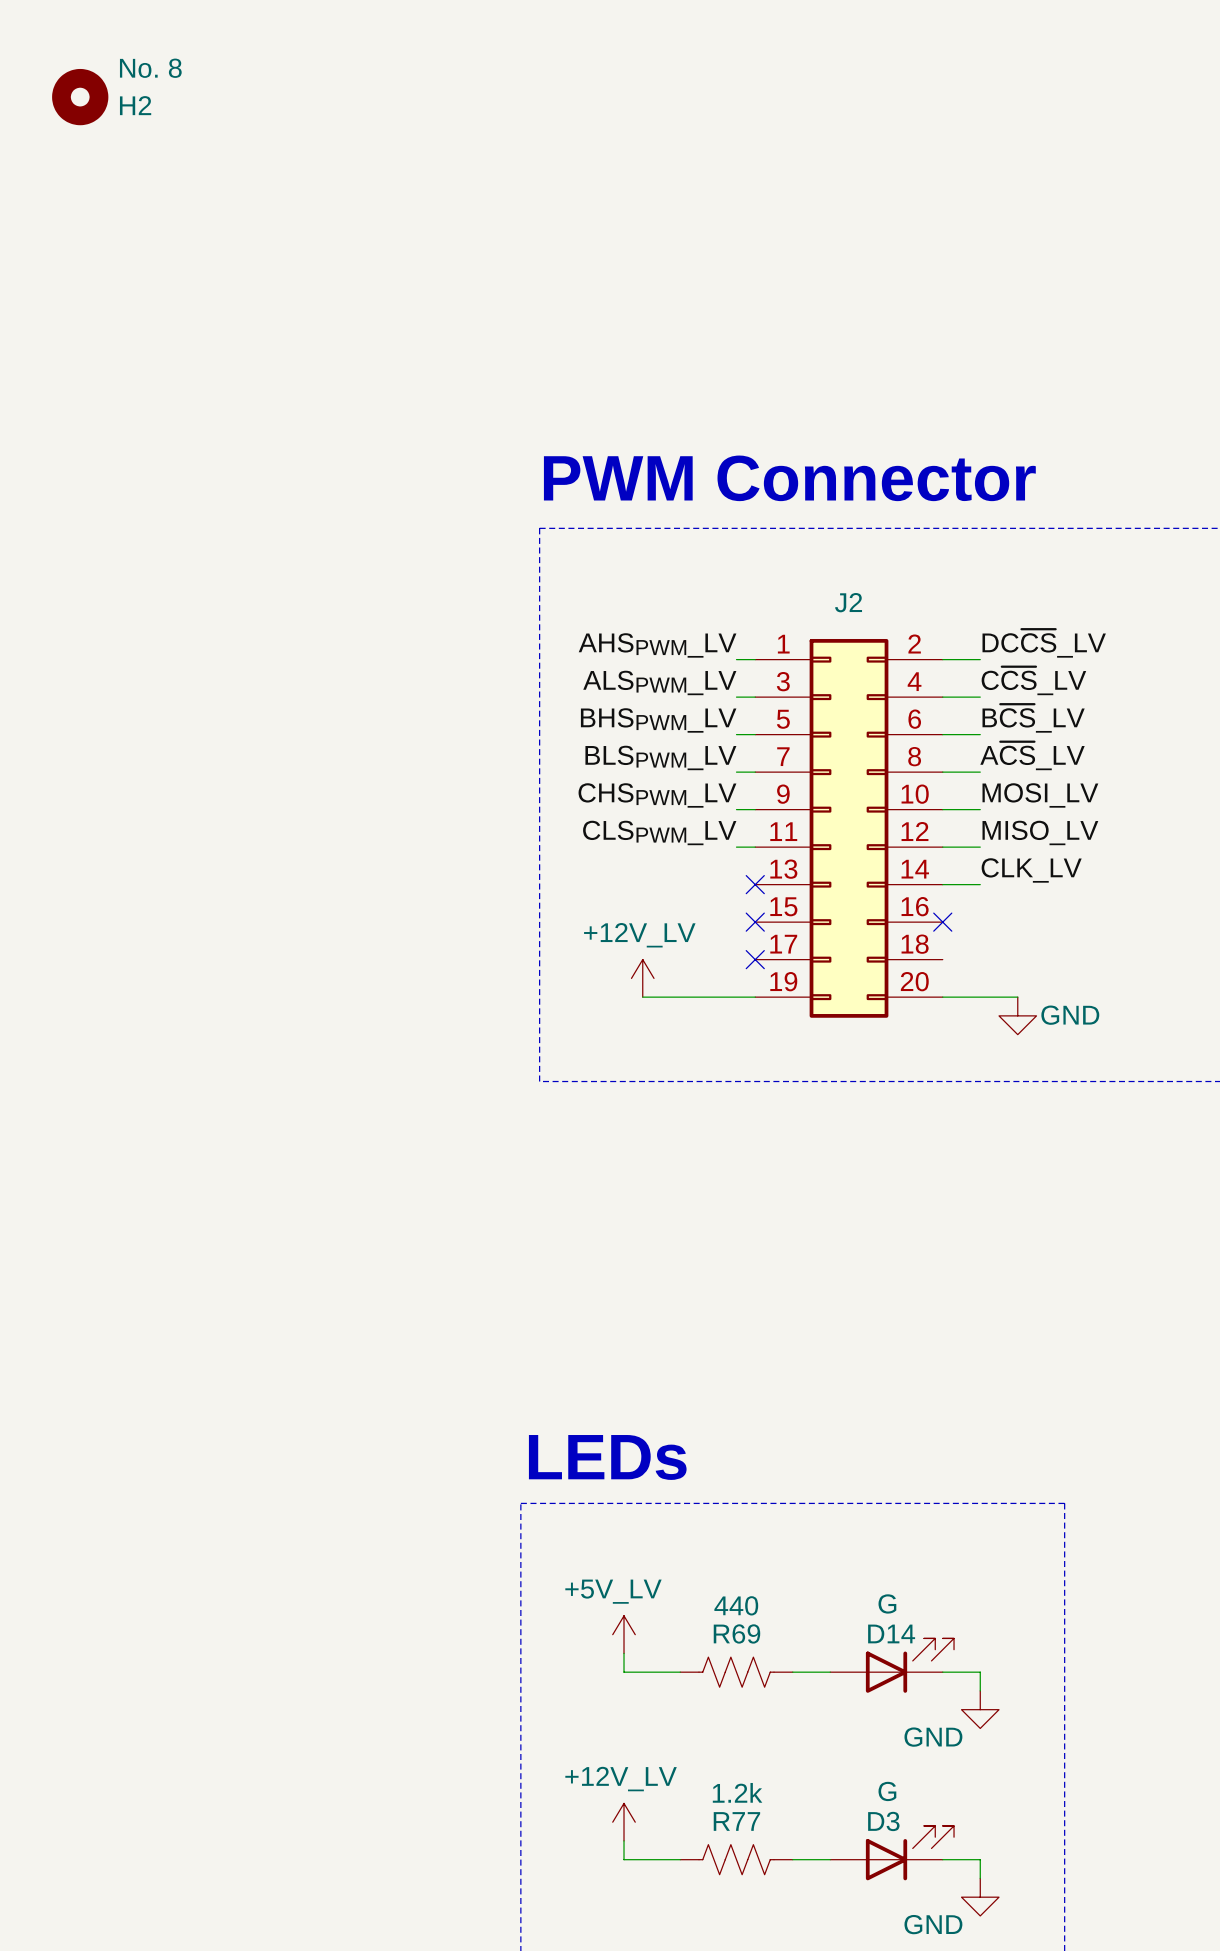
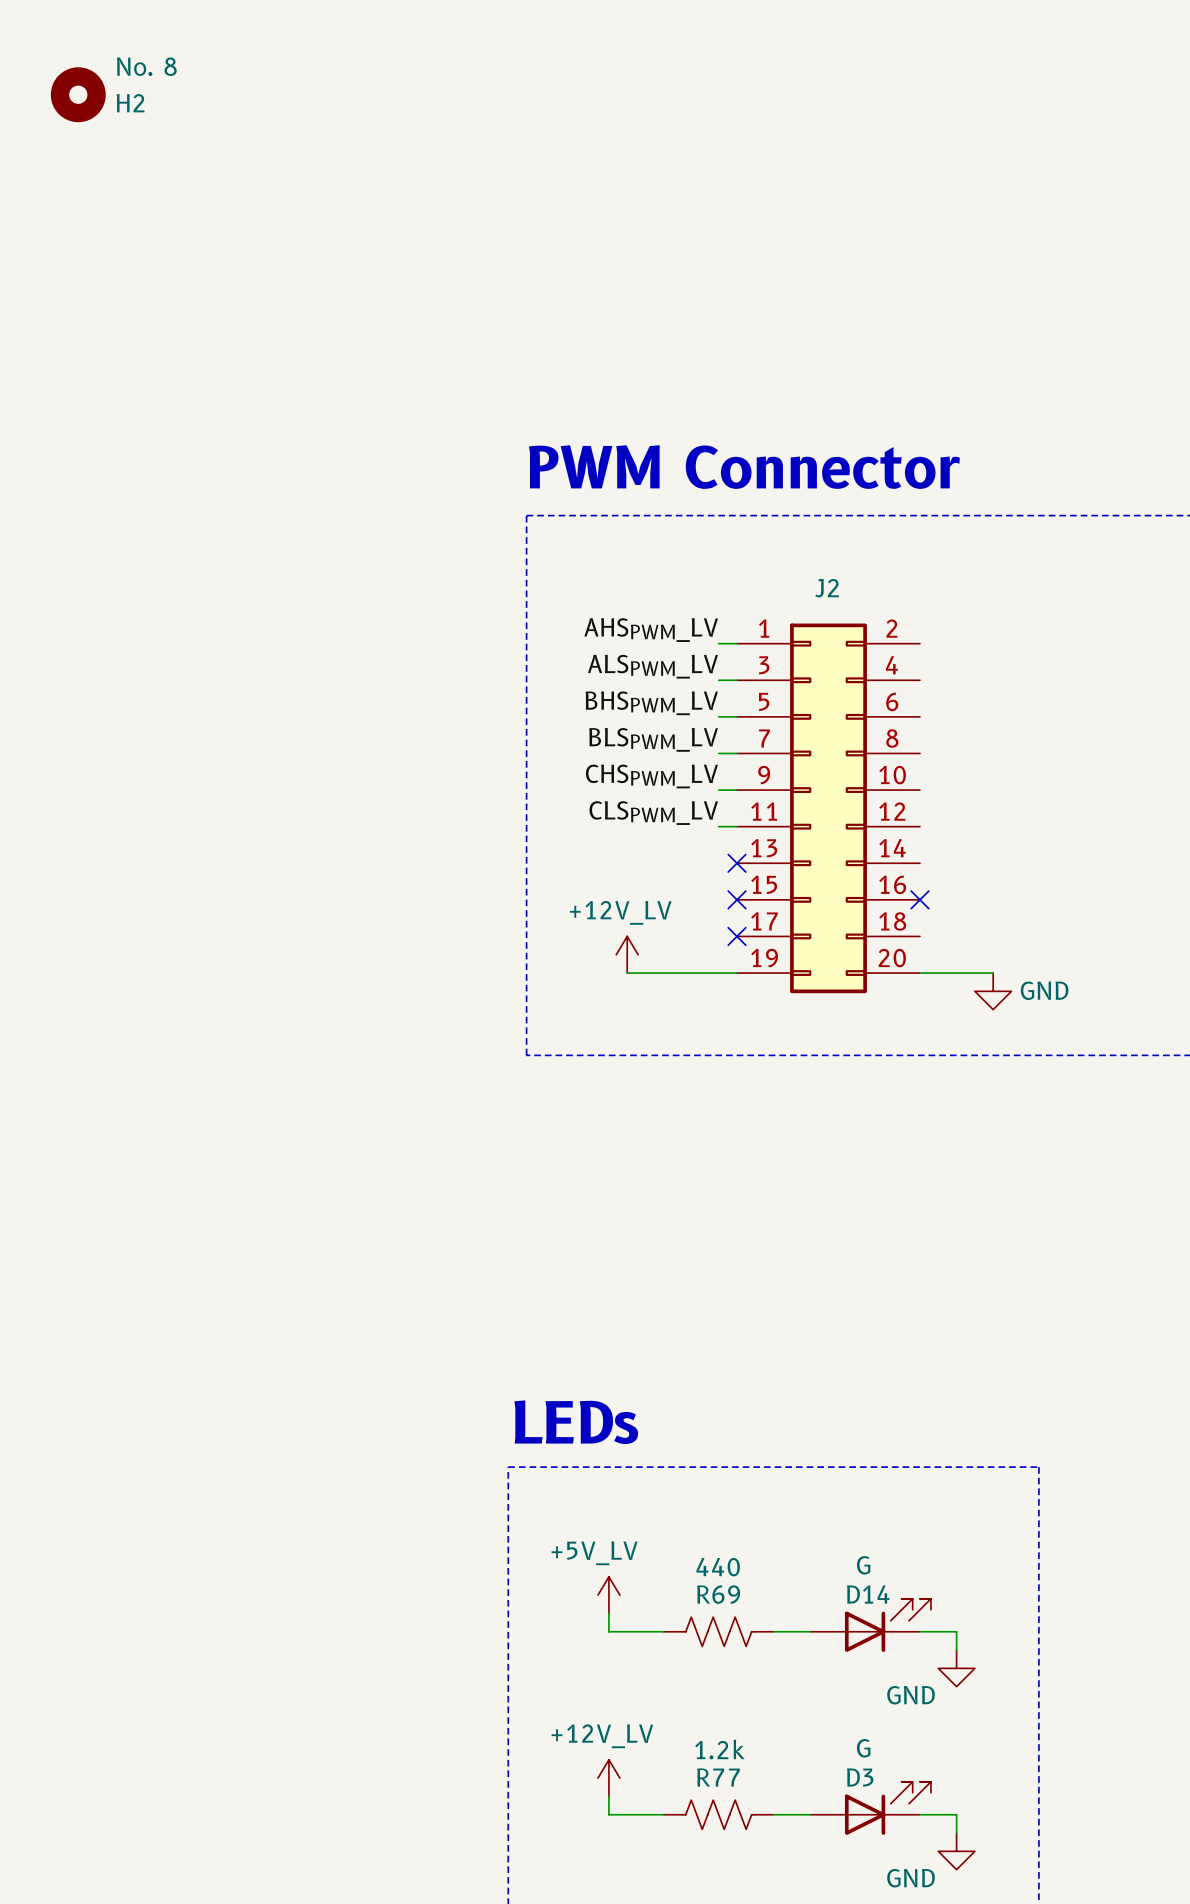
label: DC~{CS}_LV (1044, 643) -> none
wire: (942, 659) (980, 659) -> none
label: C~{CS}_LV (1033, 680) -> none
wire: (942, 697) (980, 697) -> none
label: B~{CS}_LV (1033, 718) -> none
wire: (942, 734) (980, 734) -> none
label: A~{CS}_LV (1032, 755) -> none
wire: (942, 772) (980, 772) -> none
label: MOSI_LV (1040, 795) -> none
wire: (942, 809) (980, 809) -> none
label: MISO_LV (1040, 832) -> none
wire: (942, 847) (980, 847) -> none
label: CLK_LV (1031, 870) -> none
wire: (942, 884) (980, 884) -> none

